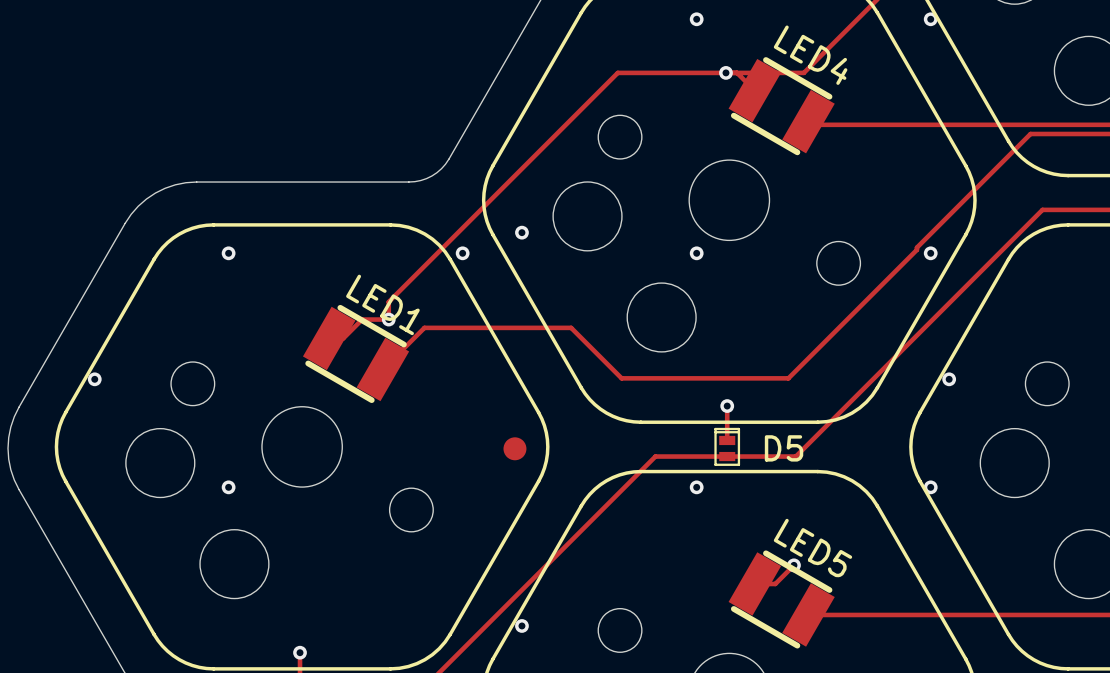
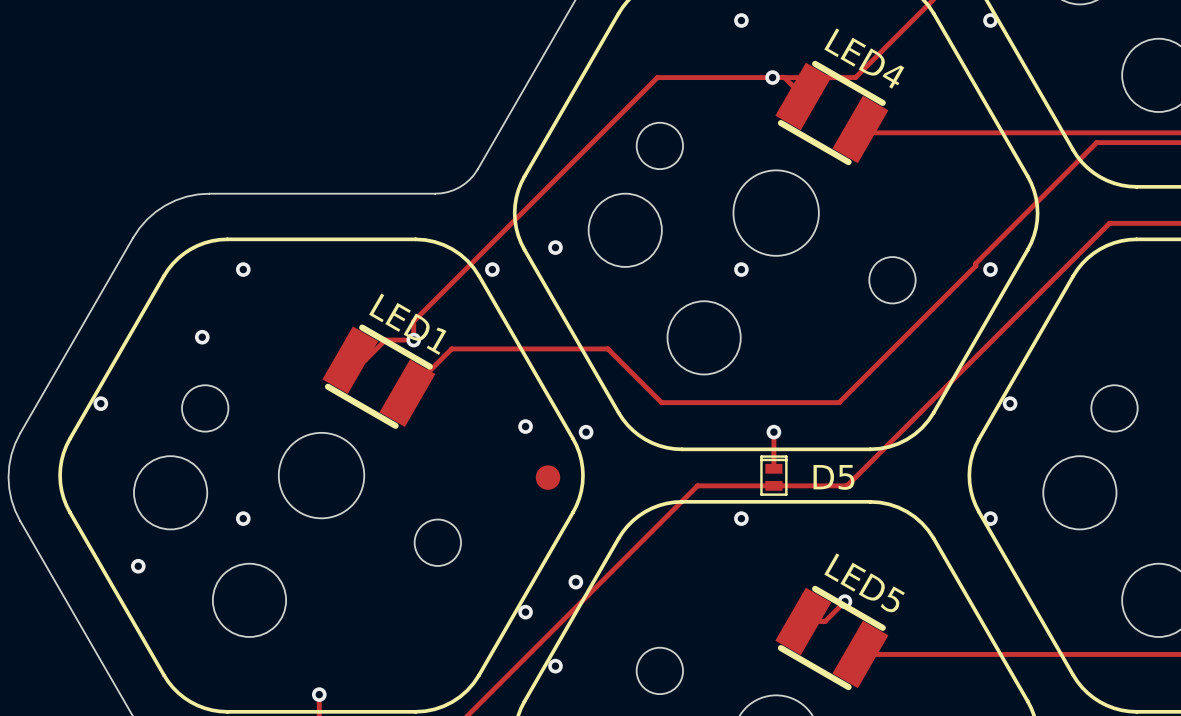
via: none -> (202, 337)
via: none -> (525, 426)
via: none -> (586, 432)
via: none -> (138, 566)
via: none -> (575, 582)
via: none -> (525, 612)

